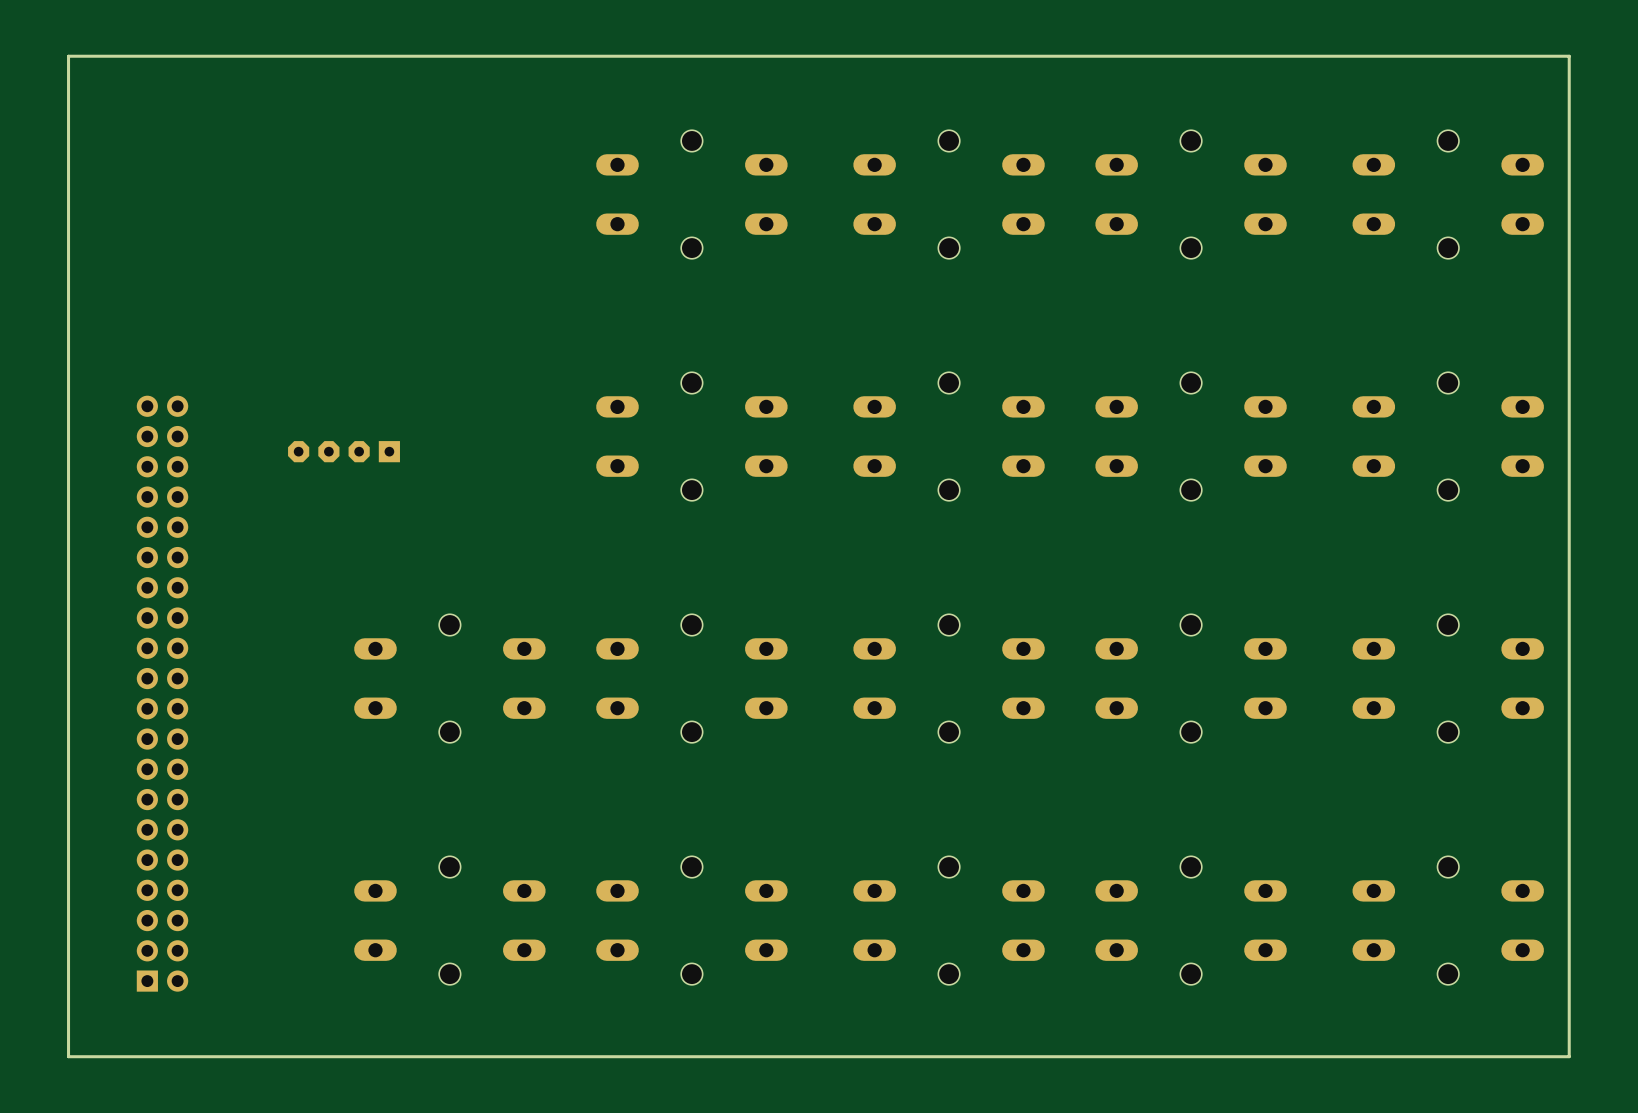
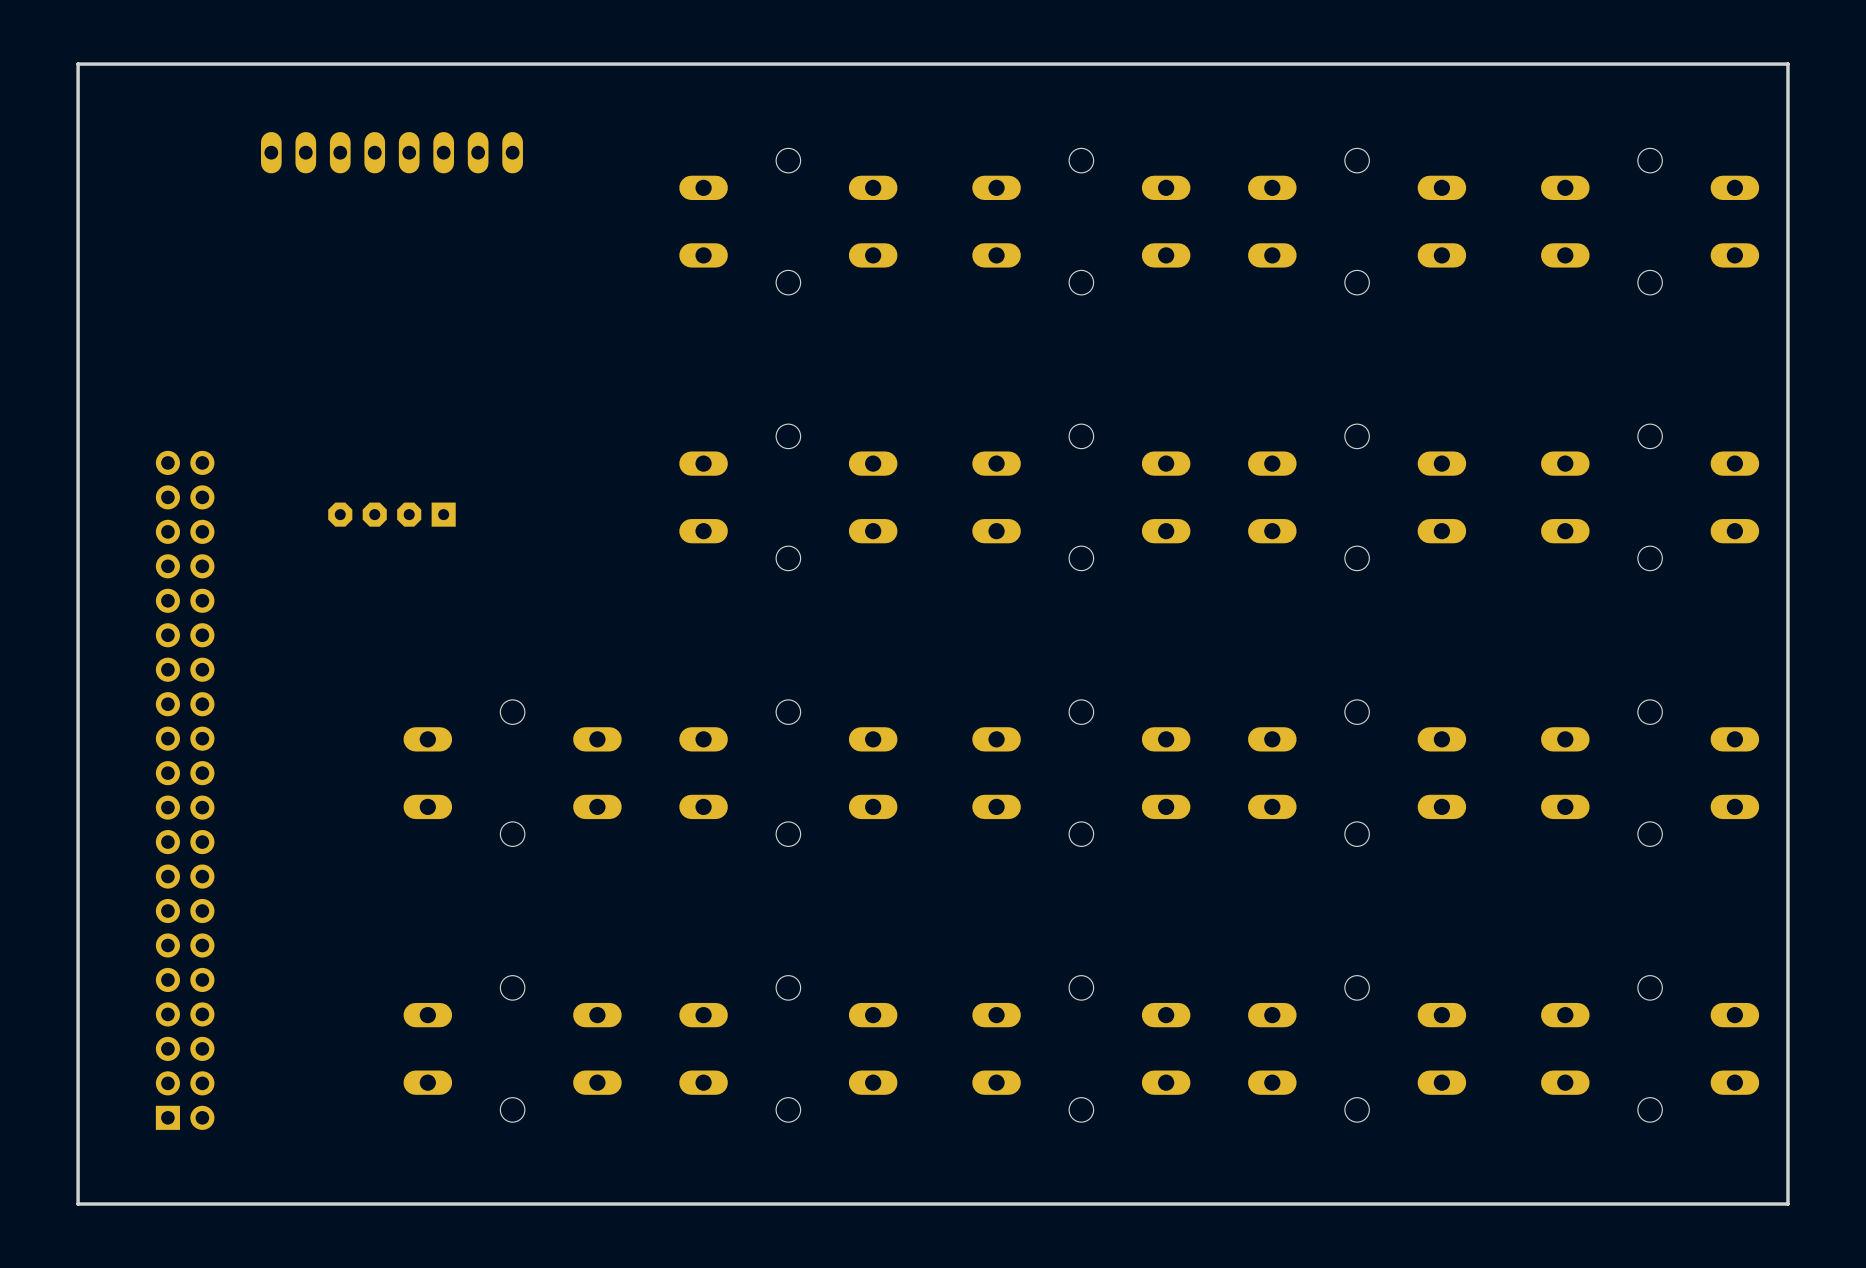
part: none -> (391, 152)

